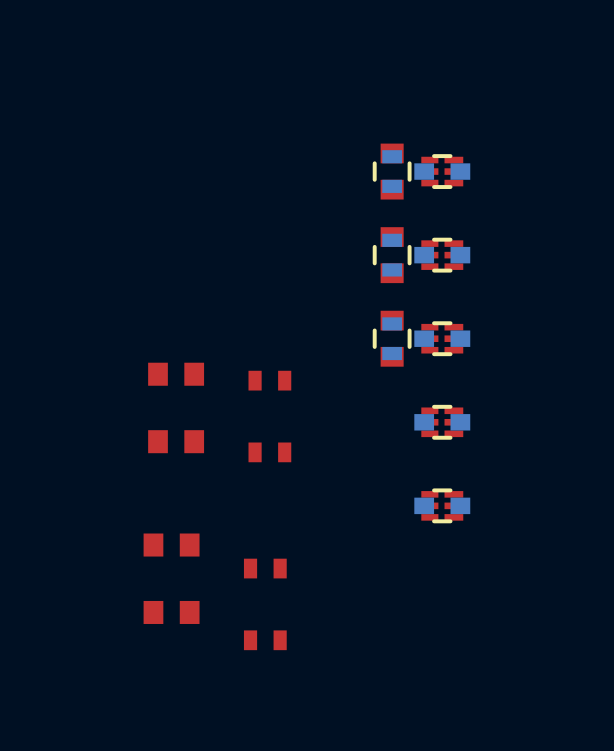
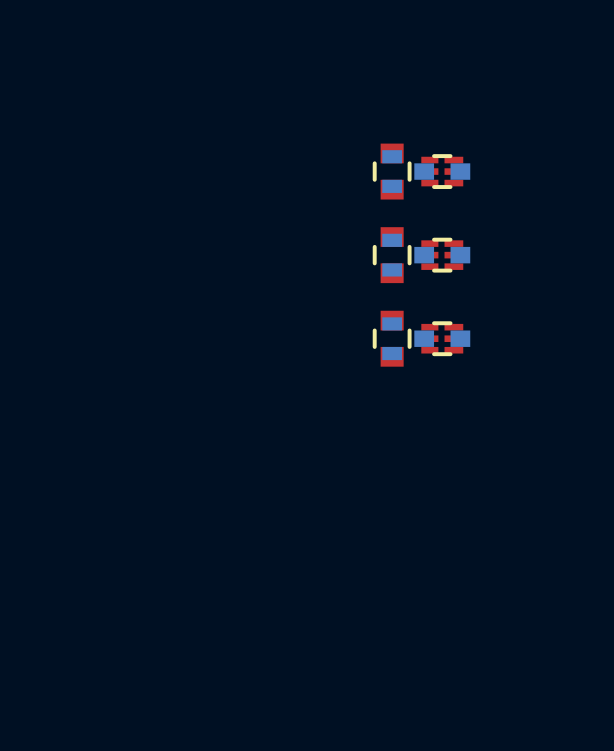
part: (176, 374) -> none
part: (269, 380) -> none
part: (442, 422) -> none
part: (442, 422) -> none
part: (176, 441) -> none
part: (269, 452) -> none
part: (442, 505) -> none
part: (442, 505) -> none
part: (171, 545) -> none
part: (265, 568) -> none
part: (171, 612) -> none
part: (265, 640) -> none

